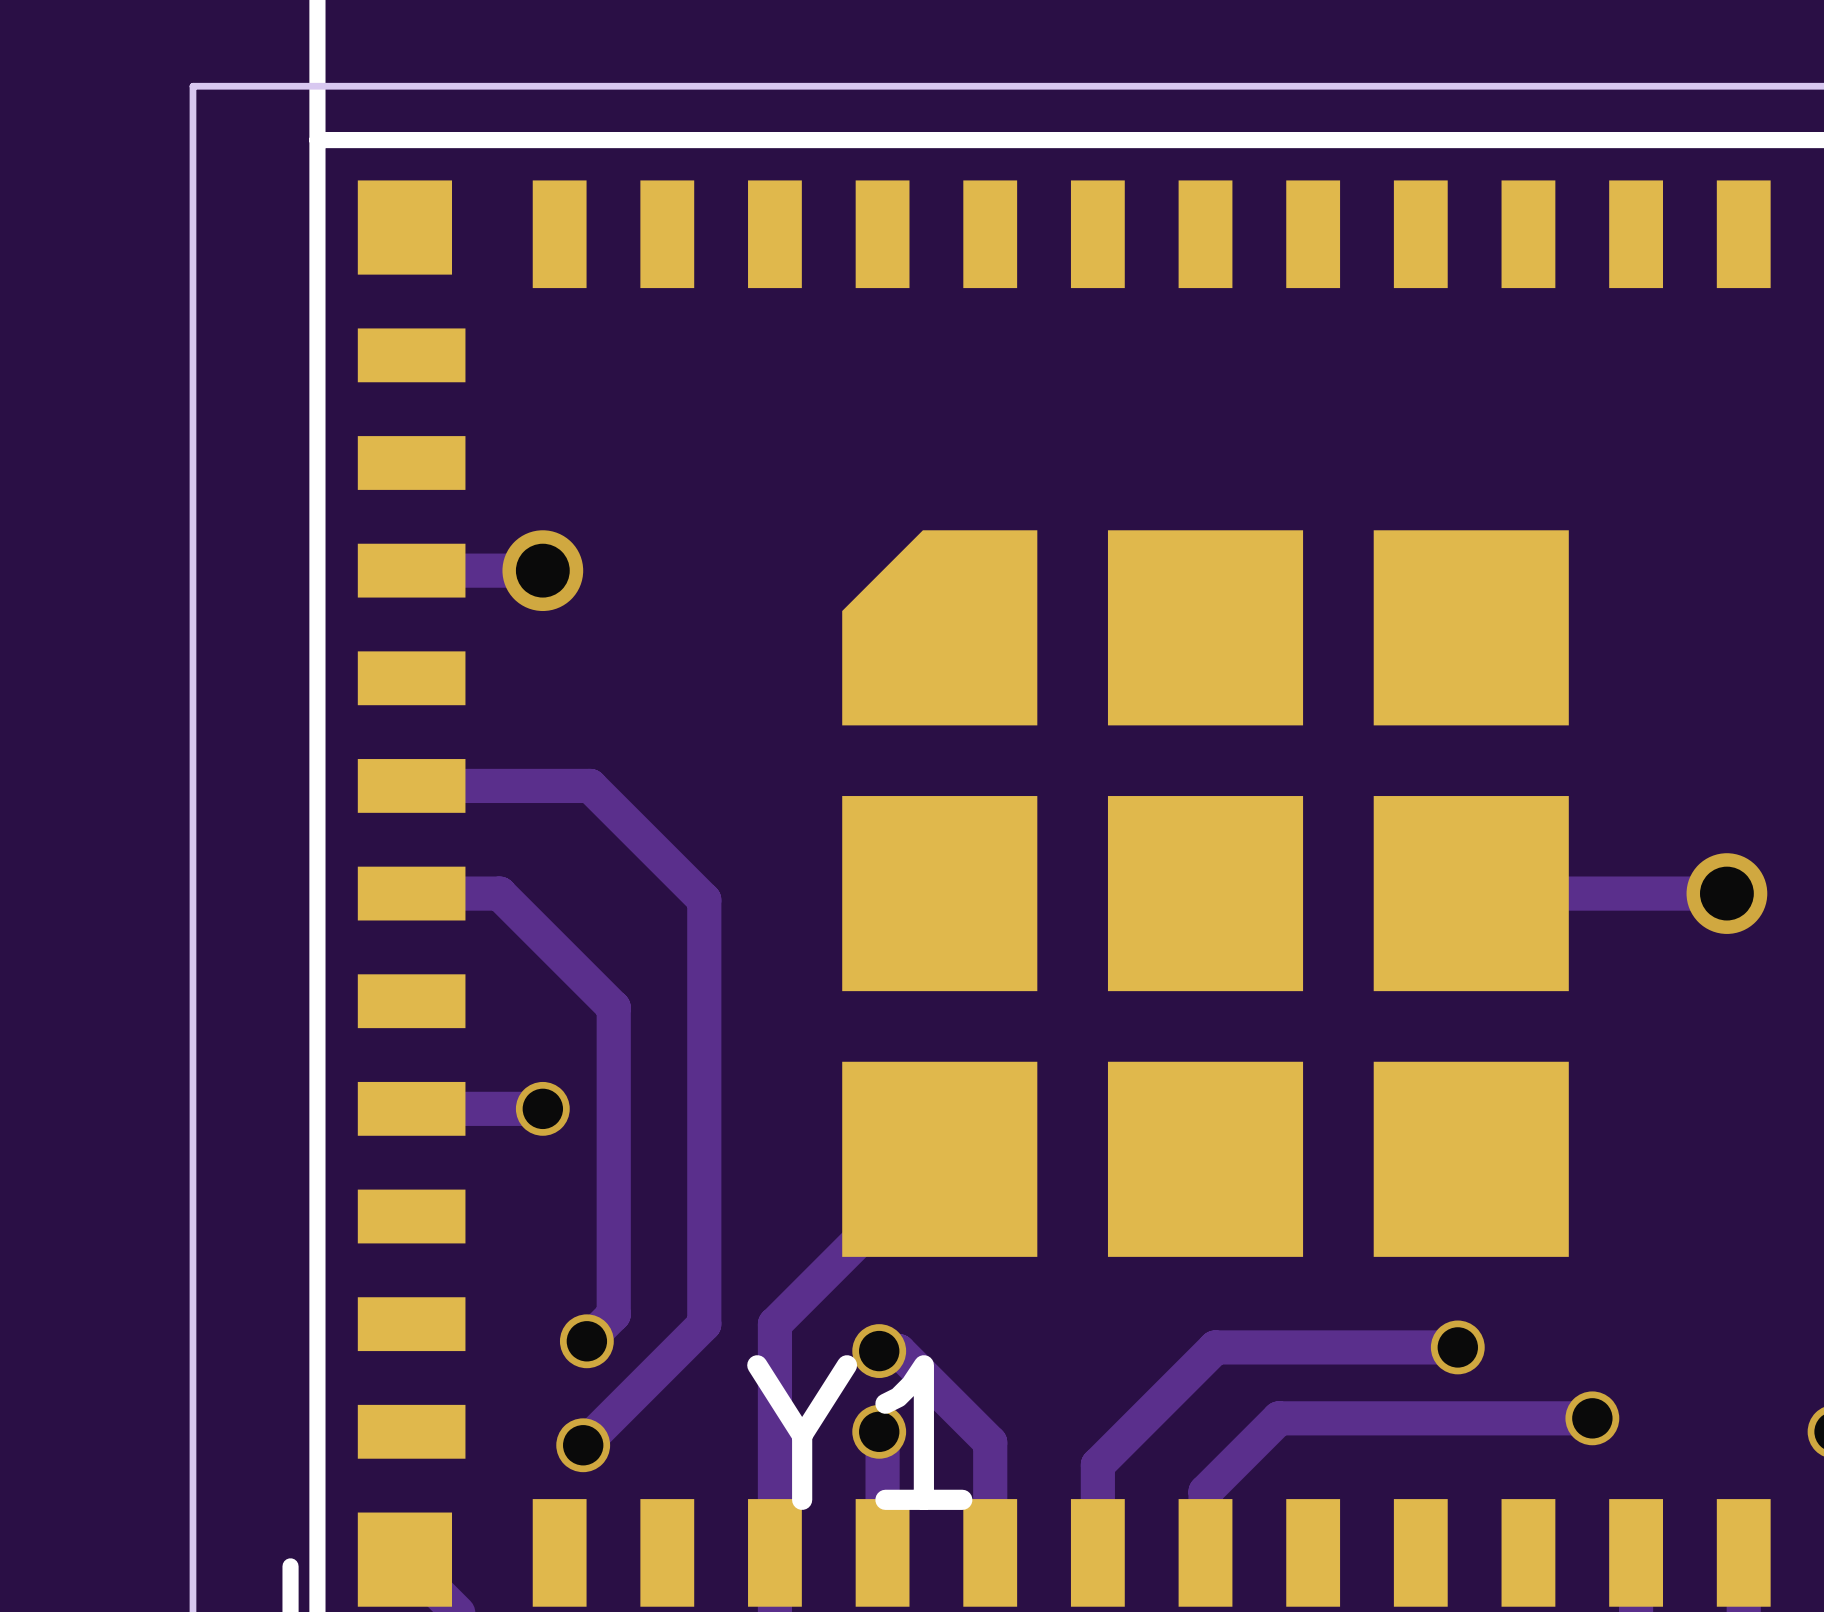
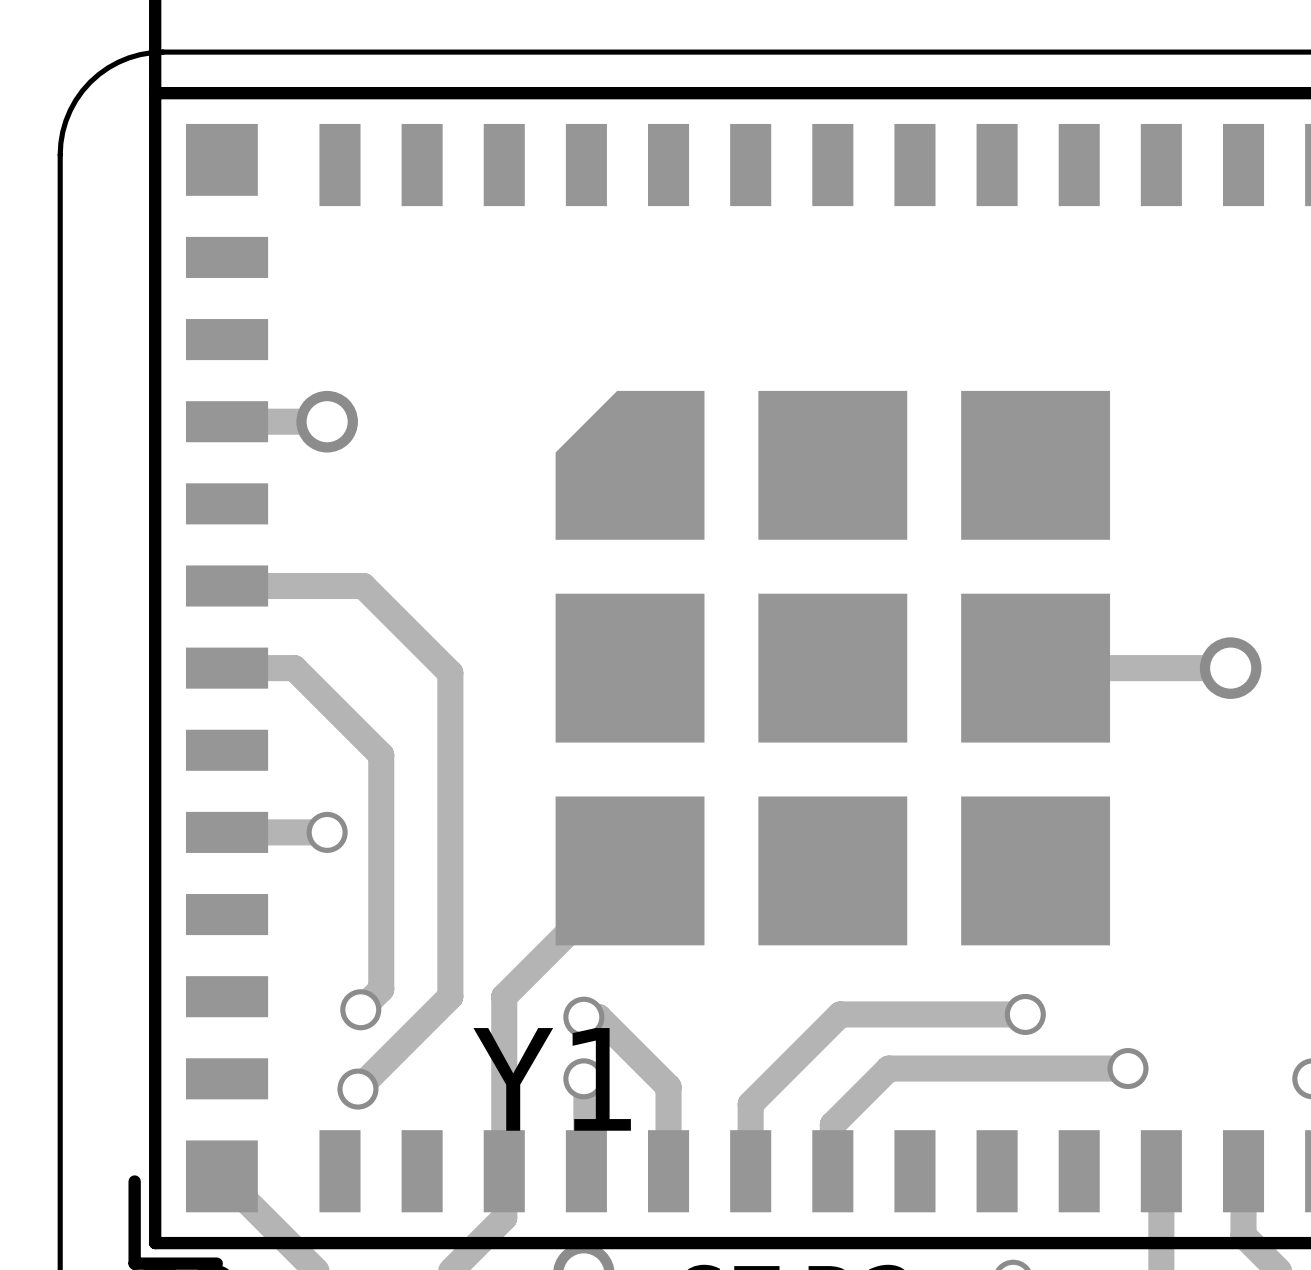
board edge: (327, 86) (192, 86) (192, 220) -> (162, 52) (140, 54) (118, 62) (90, 82) (70, 110) (62, 131) (60, 154)

